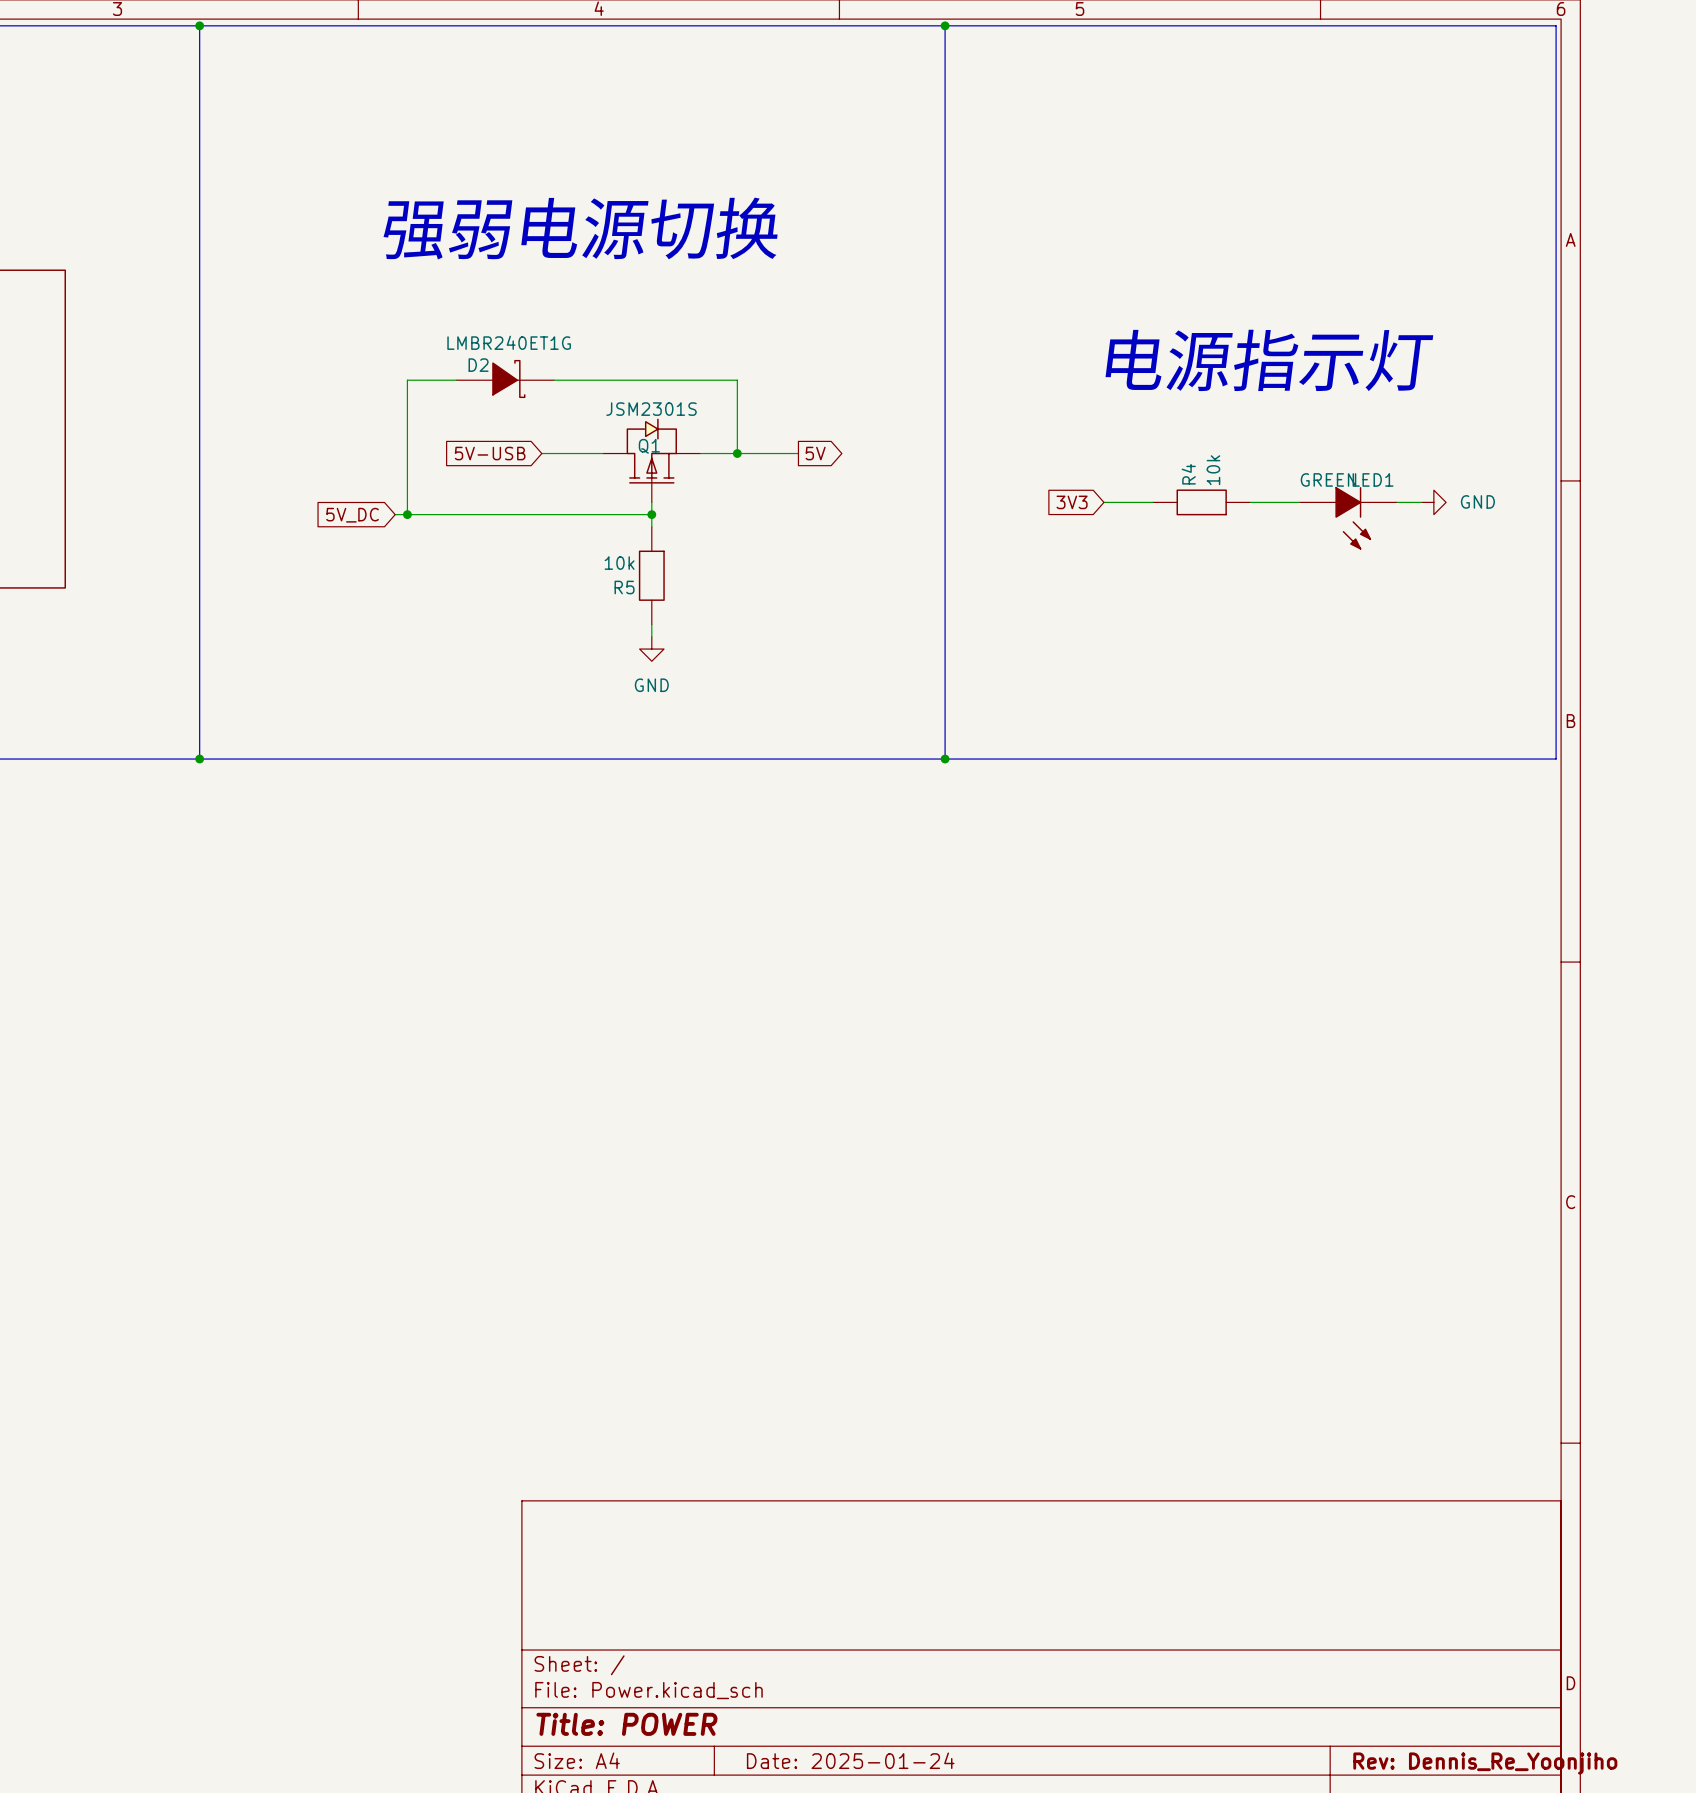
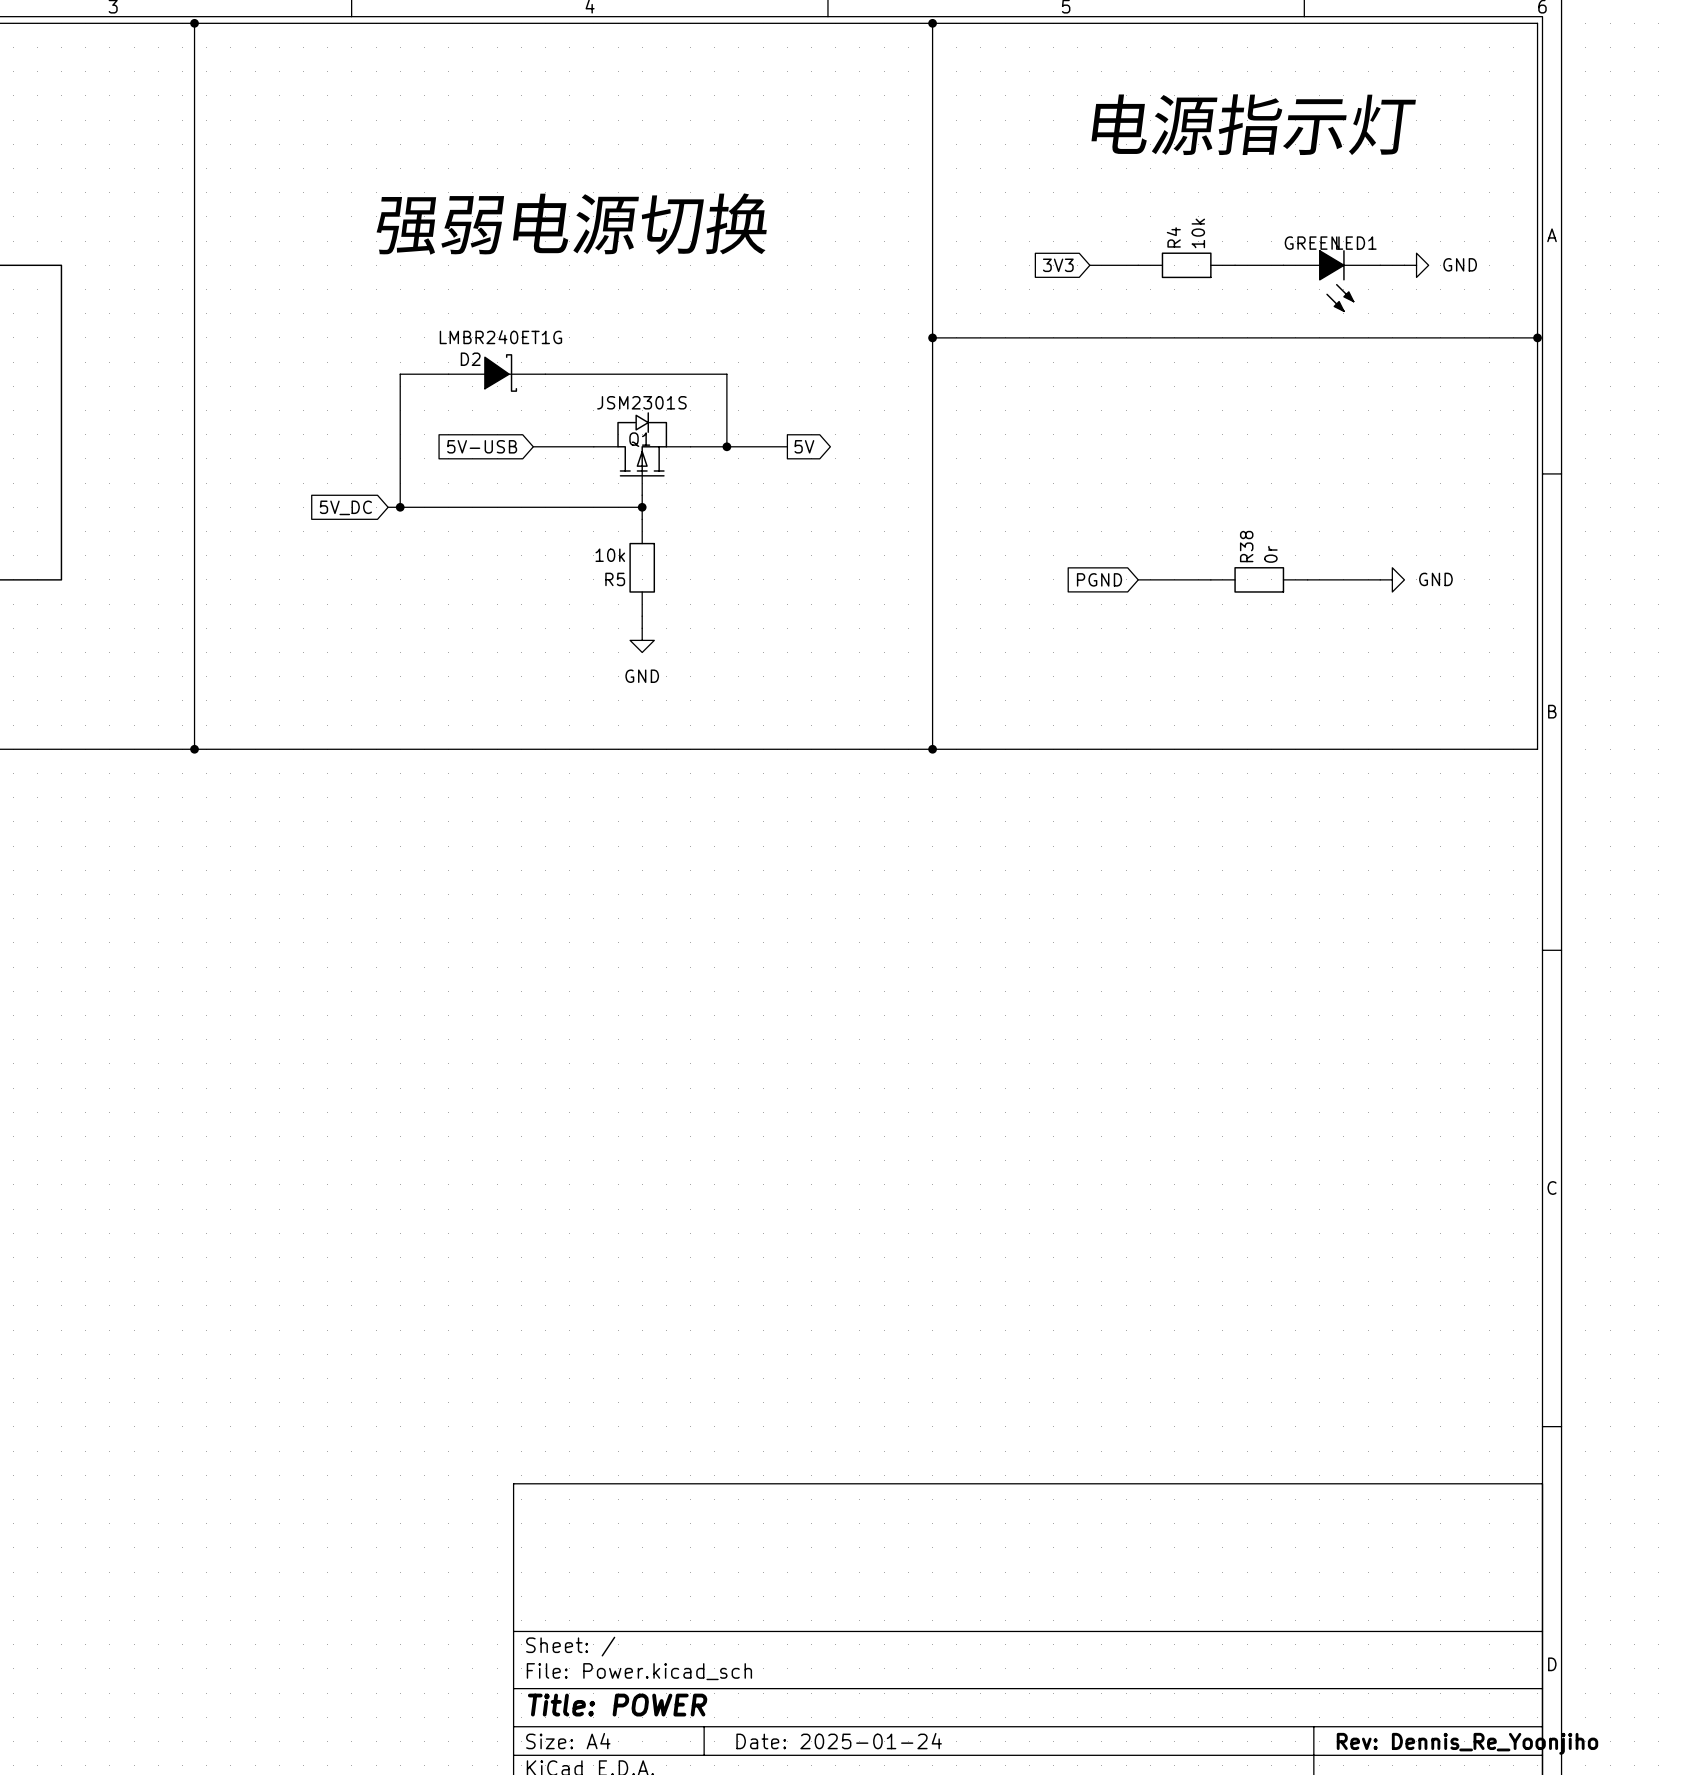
power symbol: none -> GND (1416, 265)
bus: none -> (932, 337) (1537, 337)
junction: none -> (932, 337)
junction: none -> (1537, 337)
text position: 电源指示灯 (1269, 360) -> 电源指示灯 (1253, 124)
global label position: 3V3 (1072, 502) -> 3V3 (1058, 265)
wire: (1103, 502) (1152, 502) -> (1089, 265) (1138, 265)
R4 position: (1201, 502) -> (1186, 265)
wire: (1250, 502) (1299, 502) -> (1235, 265) (1283, 265)
wire: (1397, 502) (1421, 502) -> (1380, 265) (1404, 265)
power symbol position: GND (1433, 502) -> GND (1392, 579)
LED1 position: (1348, 518) -> (1331, 281)
global label: none -> PGND (1099, 579)
wire: none -> (1138, 579) (1210, 579)
R38: none -> 0r (1259, 579)
wire: none -> (1307, 579) (1380, 579)

